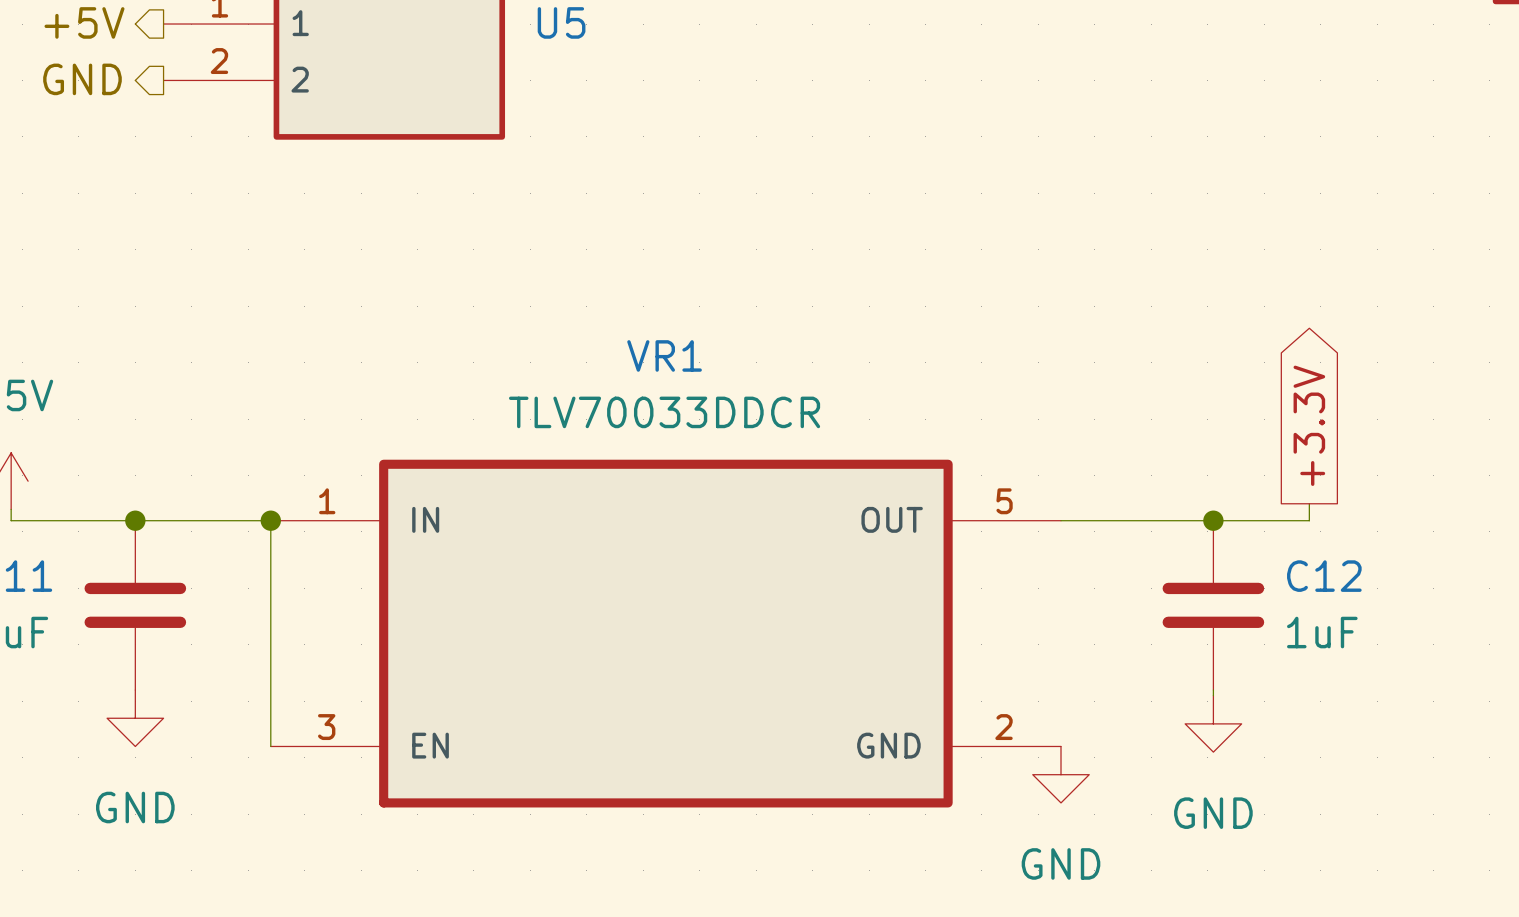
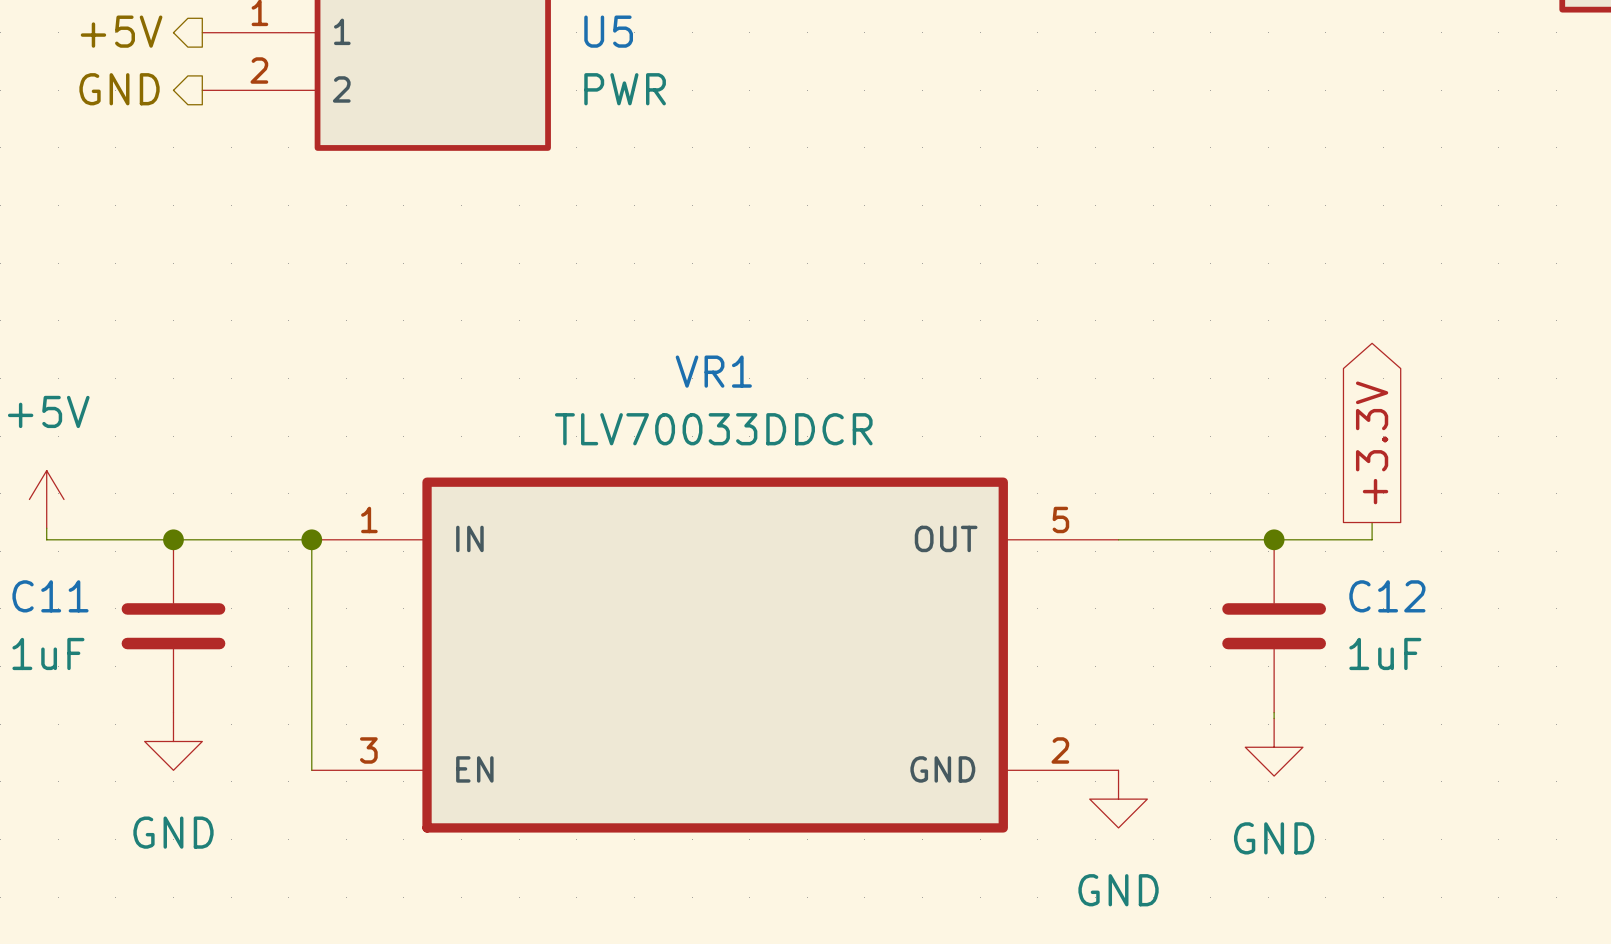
U5 value: none -> PWR (625, 89)

